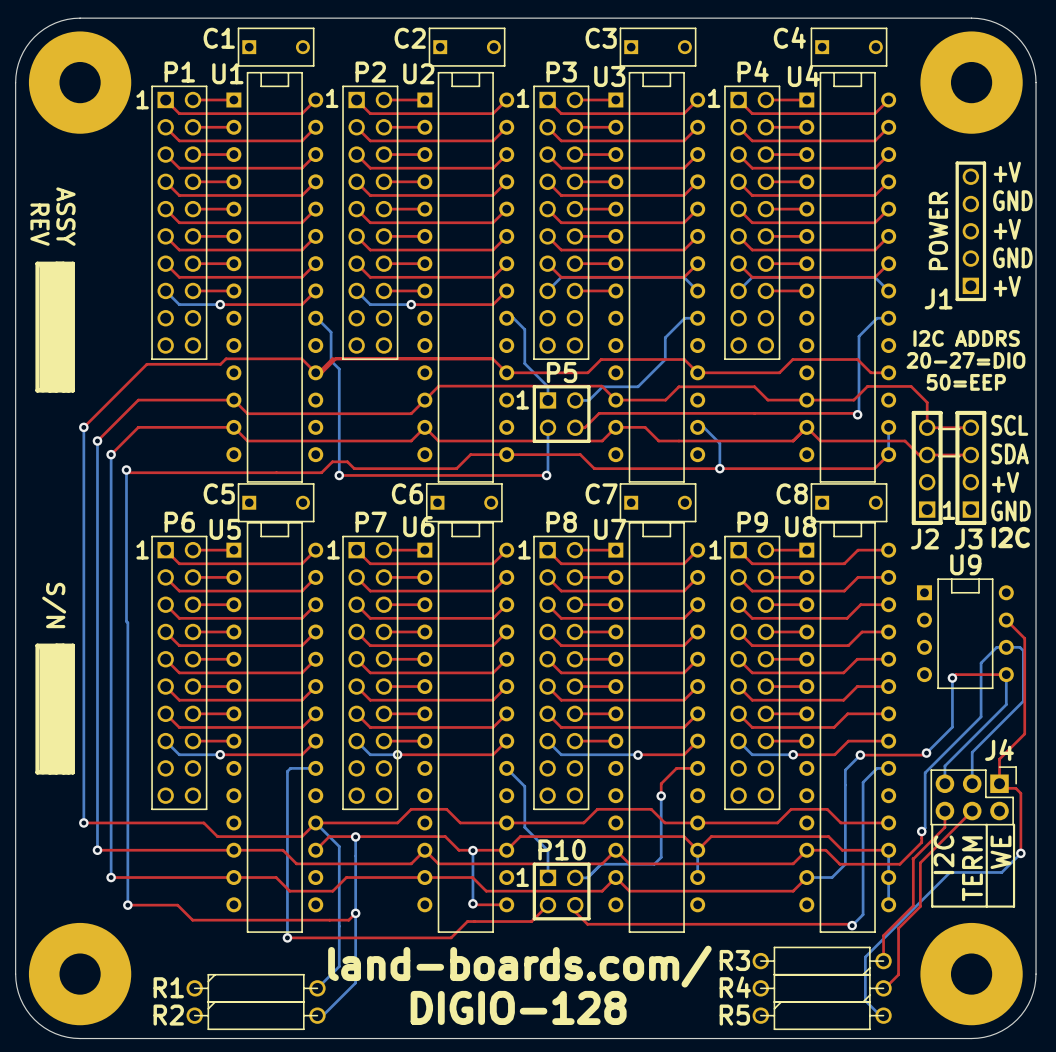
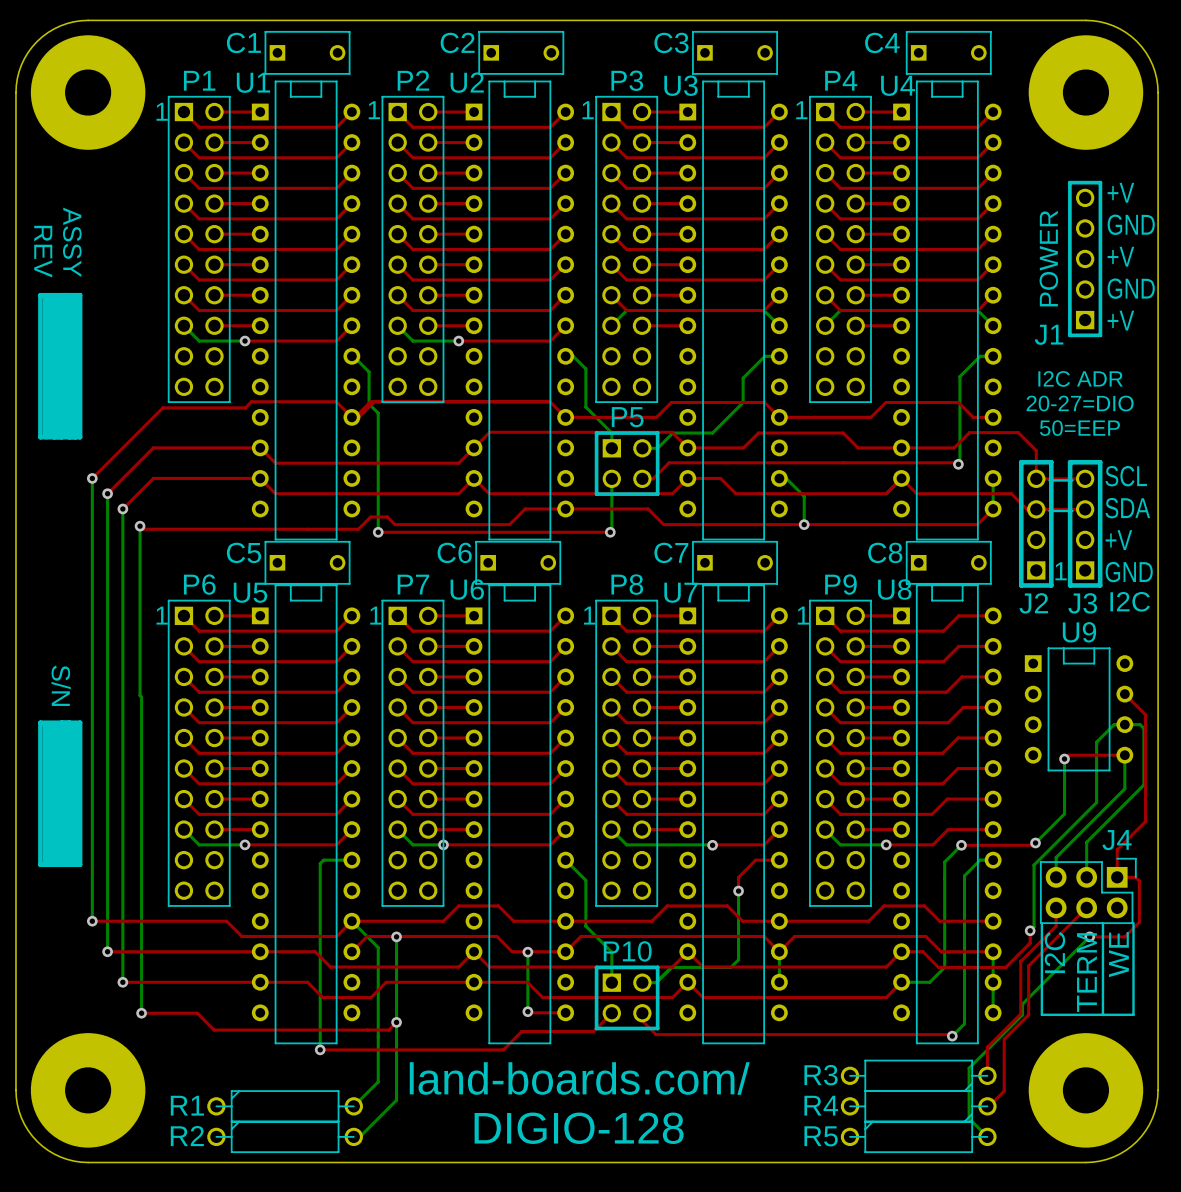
text: I2C ADDRS (966, 338) -> I2C ADR (1080, 378)
text: 1 (522, 399) -> none
top track: (999, 783) (1004, 788) (1015, 788) (1020, 793) (1020, 853) -> (1117, 877) (1135, 877) (1139, 881) (1139, 922) (1124, 936) (1089, 936)
bottom track: (1020, 853) (1001, 872) (949, 872) (865, 957) (865, 1000) (880, 1015) (883, 1015) -> (1089, 936) (1022, 1004) (1022, 1014) (969, 1068) (969, 1118) (987, 1136)
via position: (1020, 853) -> (1089, 936)
text: 1 (522, 877) -> none

